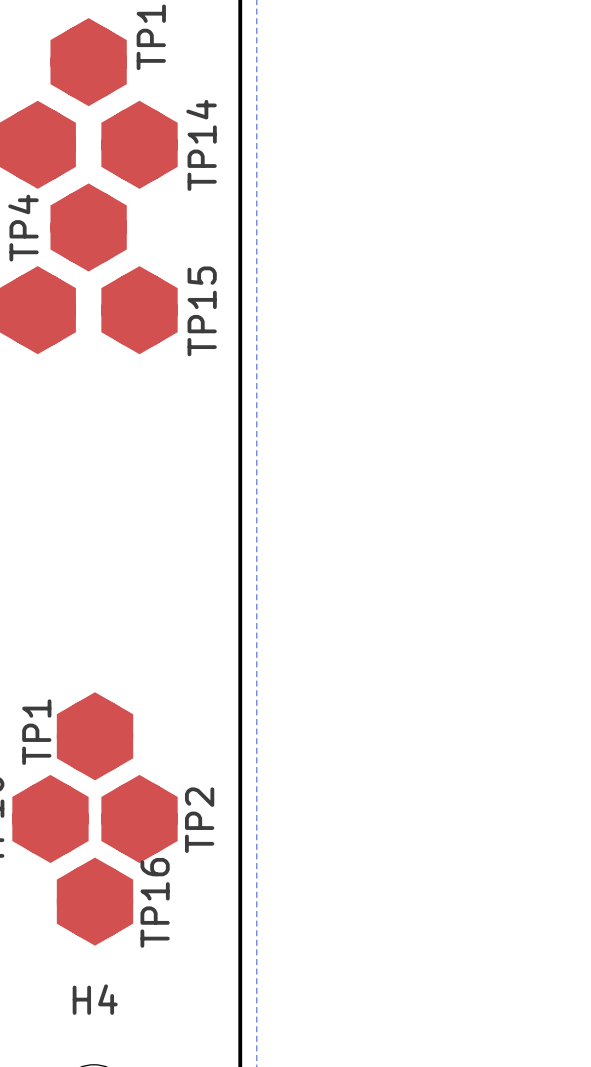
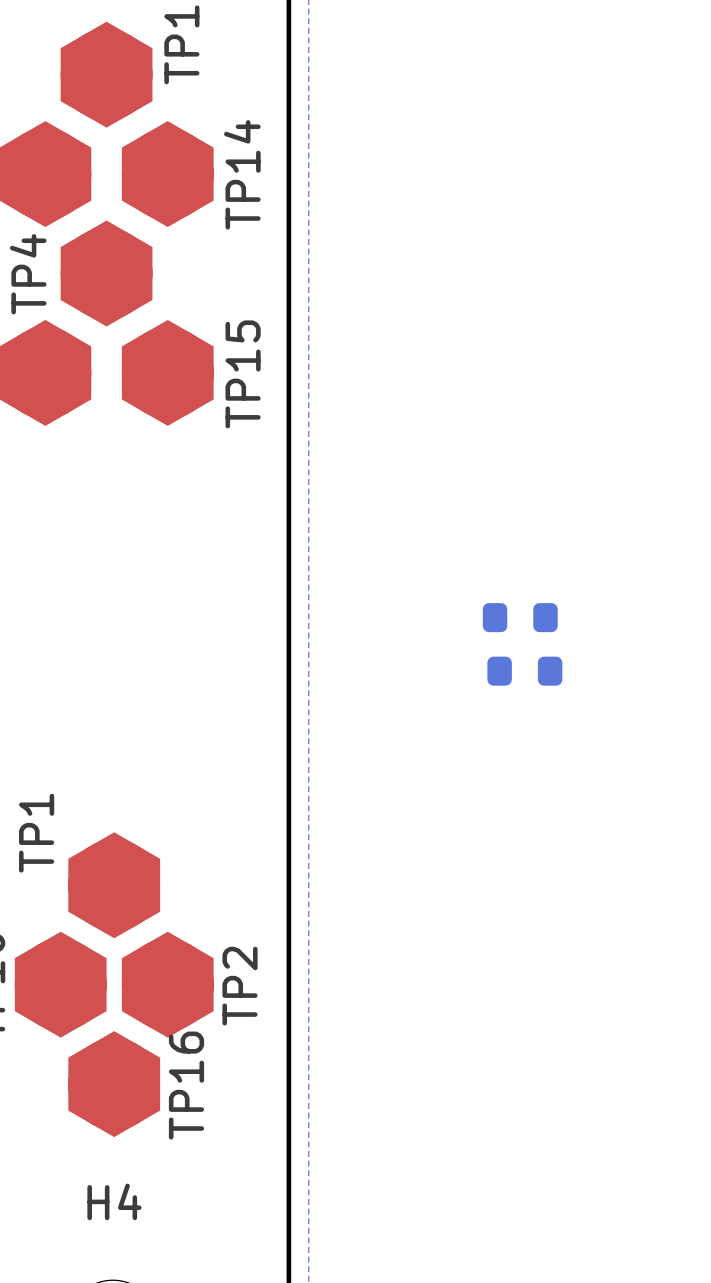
part: none -> (520, 617)
part: none -> (524, 671)
TP1 name position: TP1 (36, 732) -> TP1 (36, 833)

